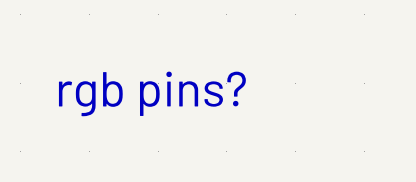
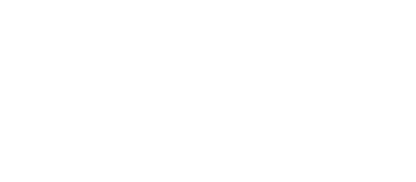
text: rgb pins? (152, 93) -> none

